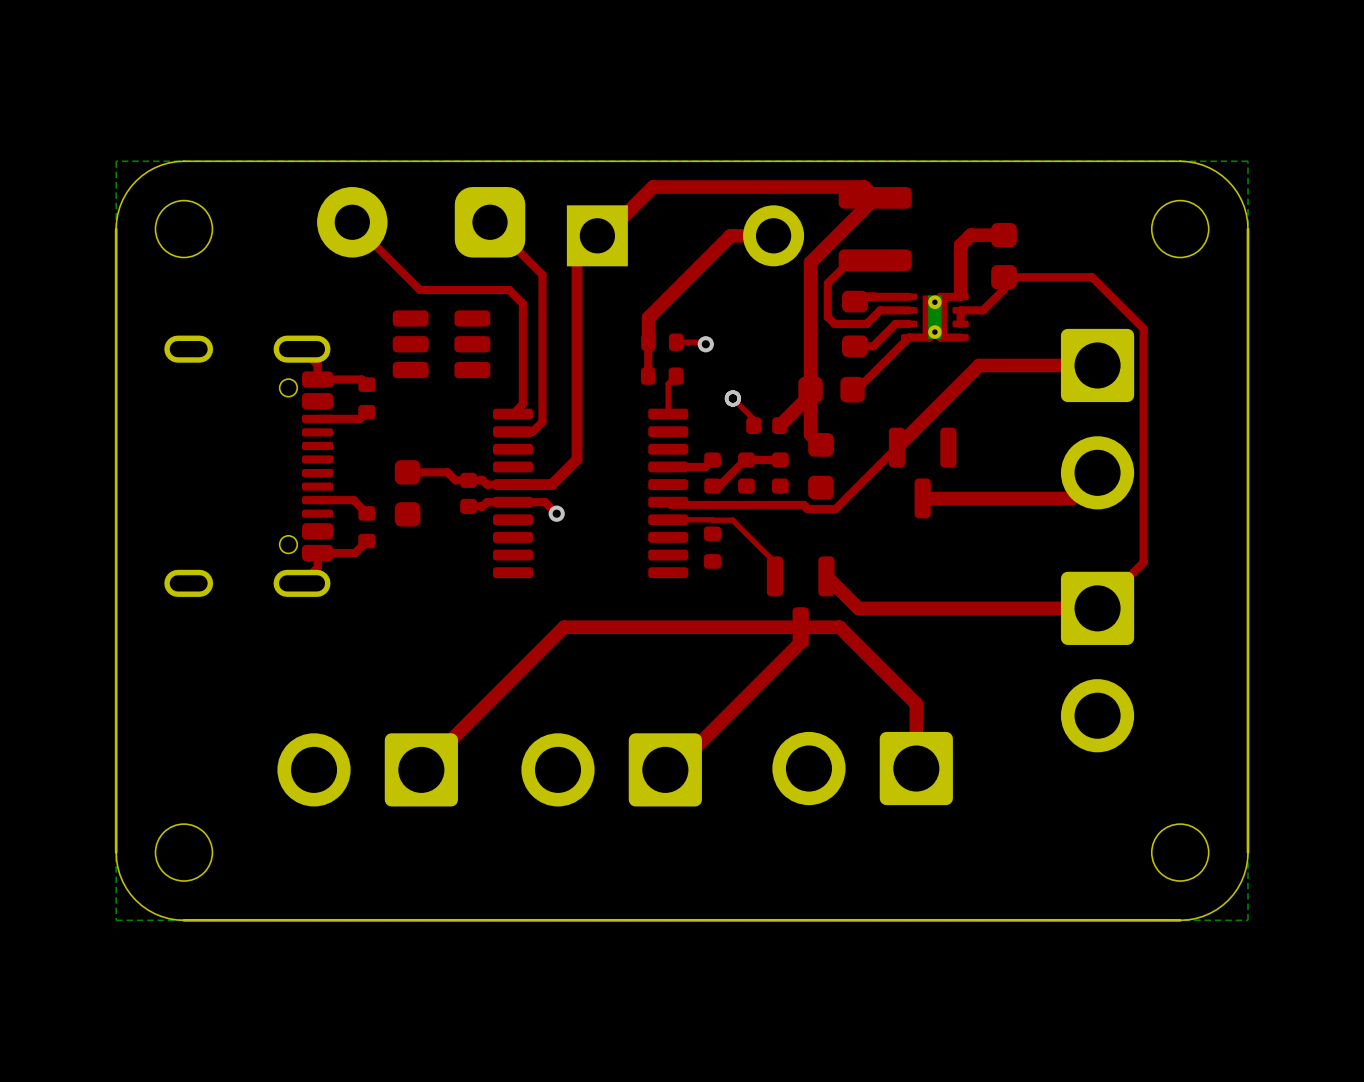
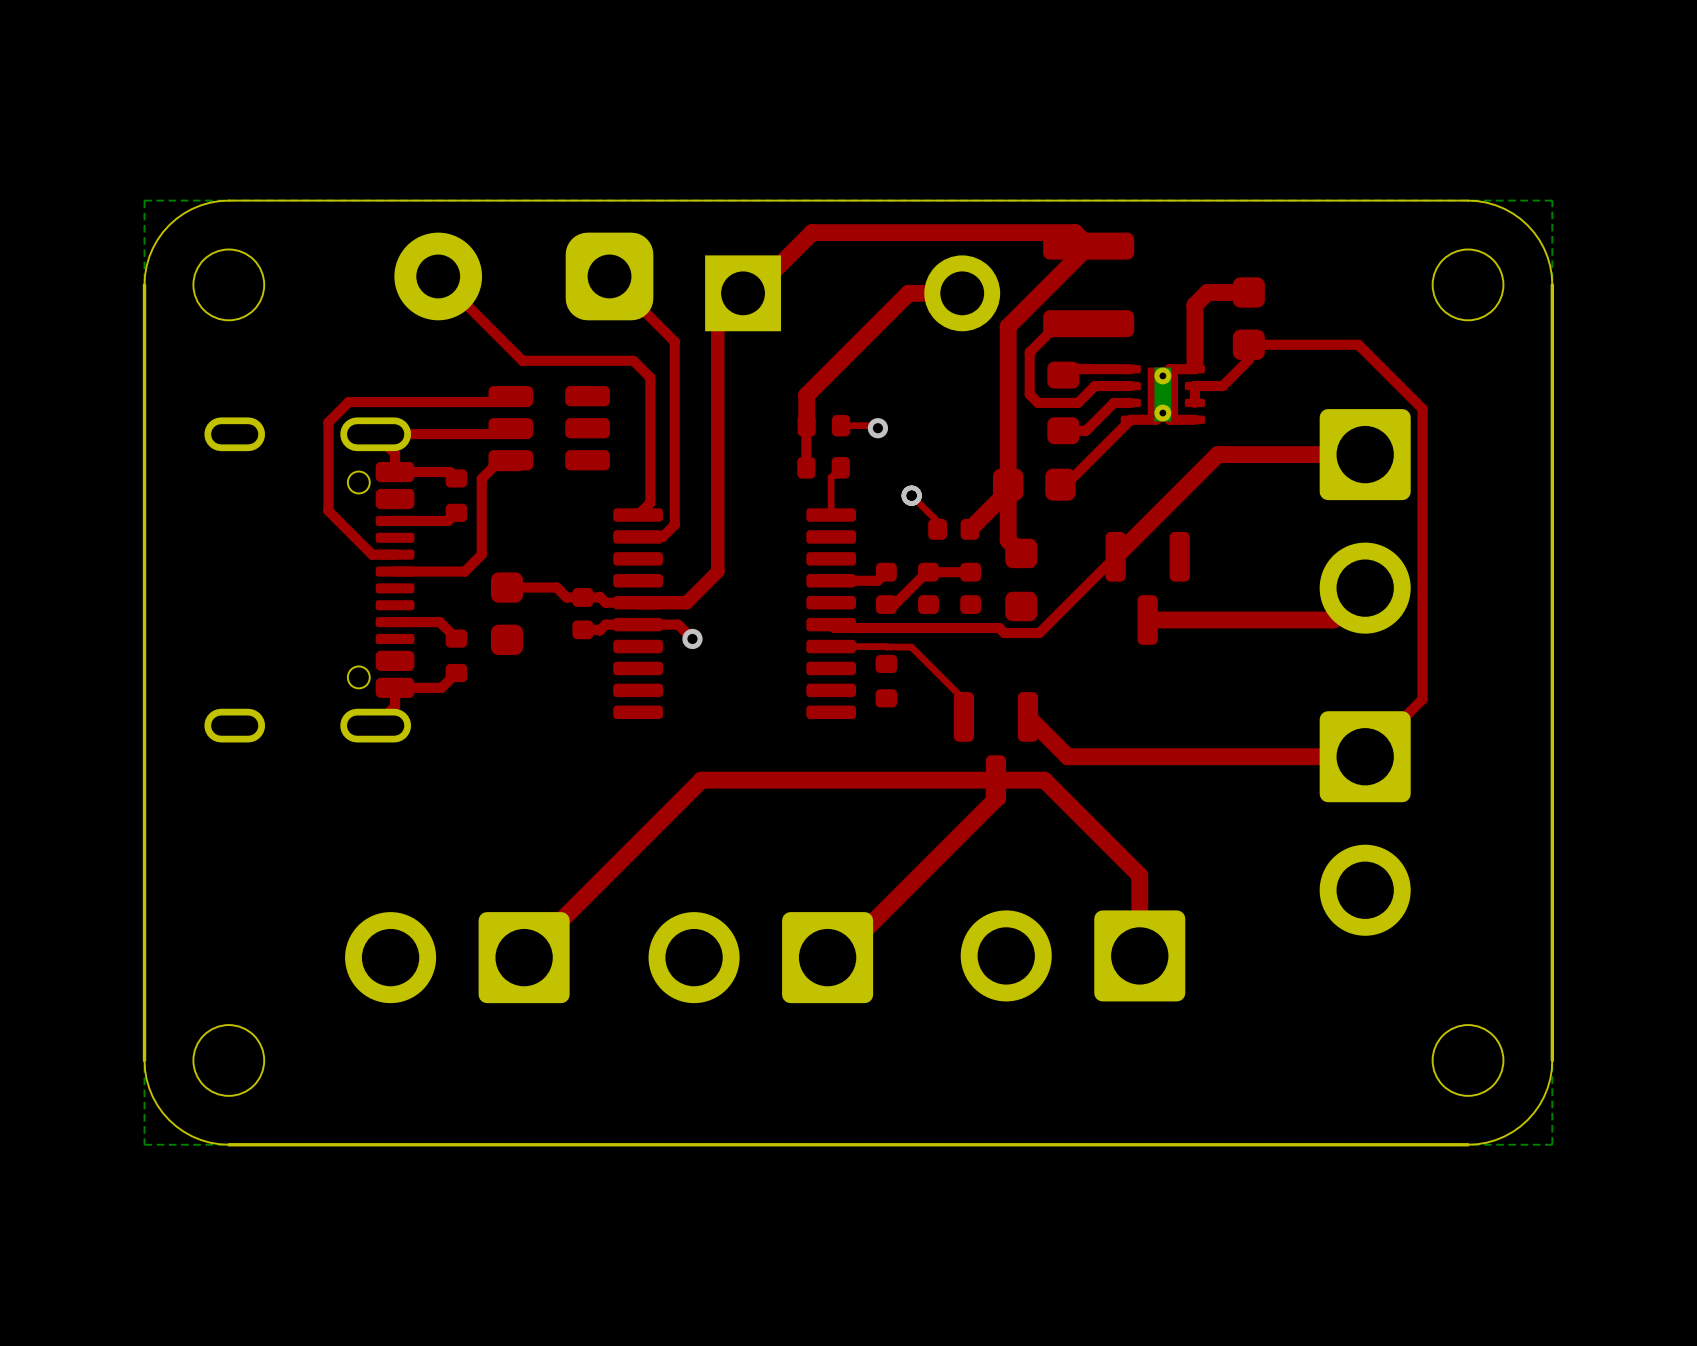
top track: none -> (527, 402) (348, 402) (328, 422) (328, 510) (372, 554) (395, 554)
top track: none -> (527, 434) (375, 434)
top track: none -> (519, 466) (494, 466) (481, 478) (481, 554) (464, 571) (395, 571)

